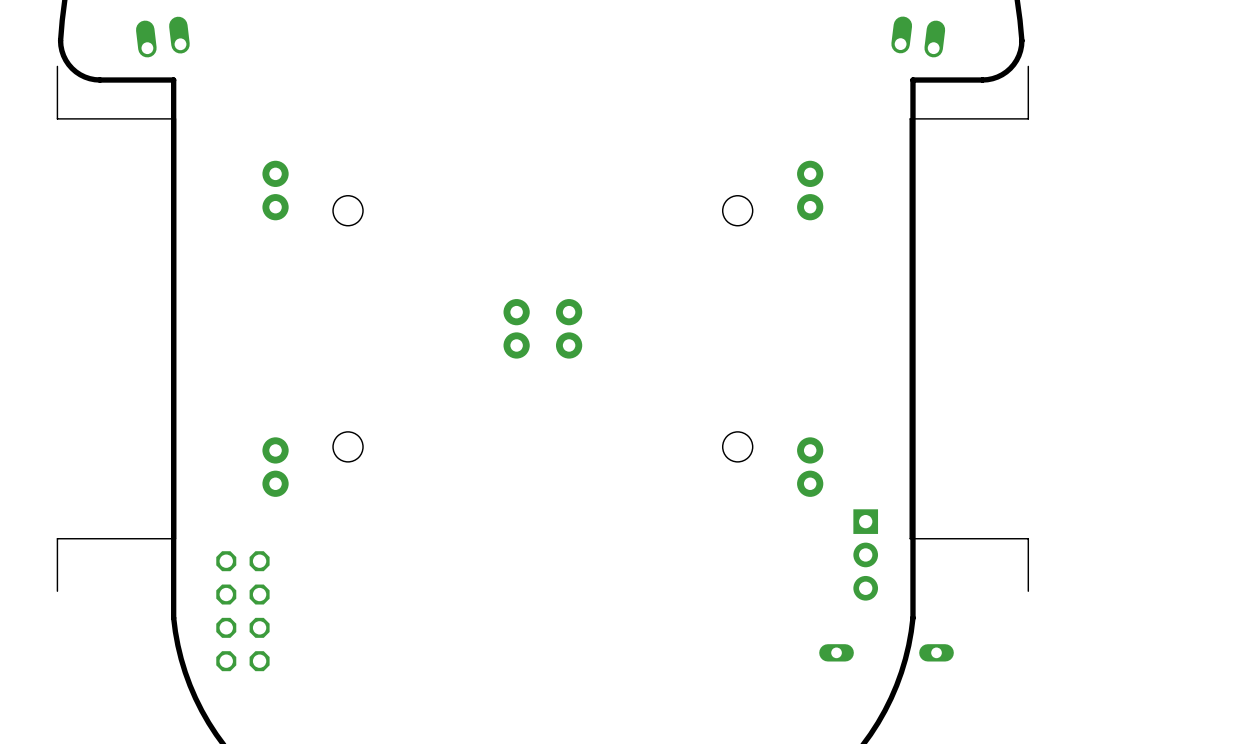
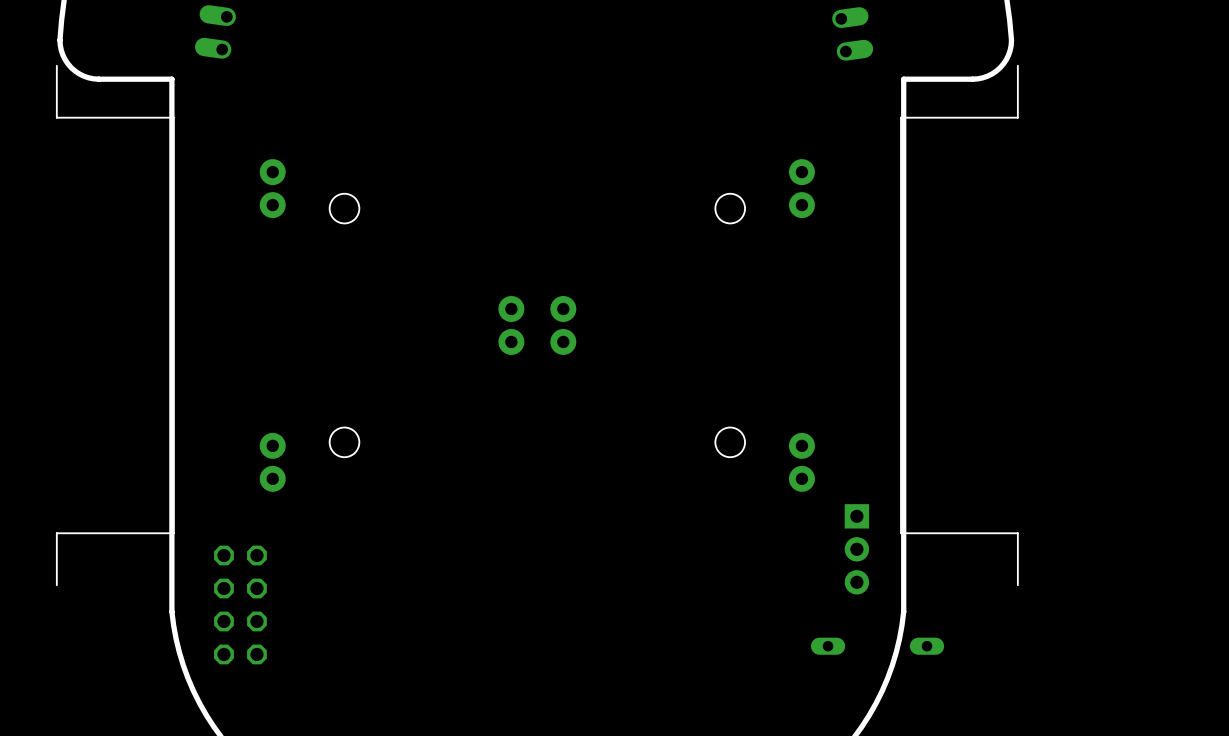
part: none -> (215, 31)
part: none -> (852, 33)
part: (918, 36) -> none
part: (162, 37) -> none

